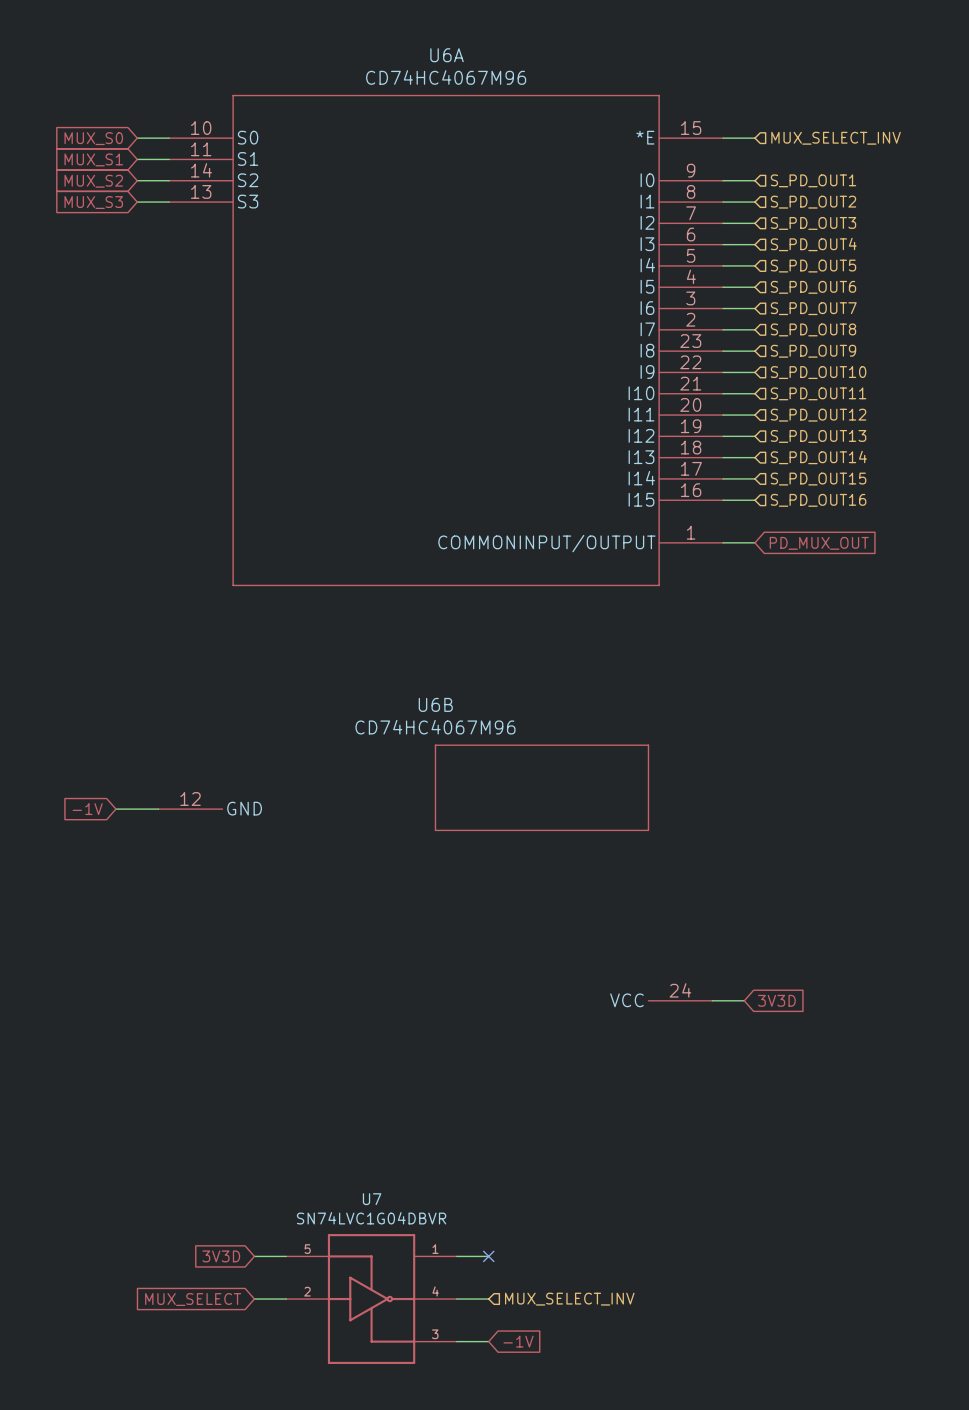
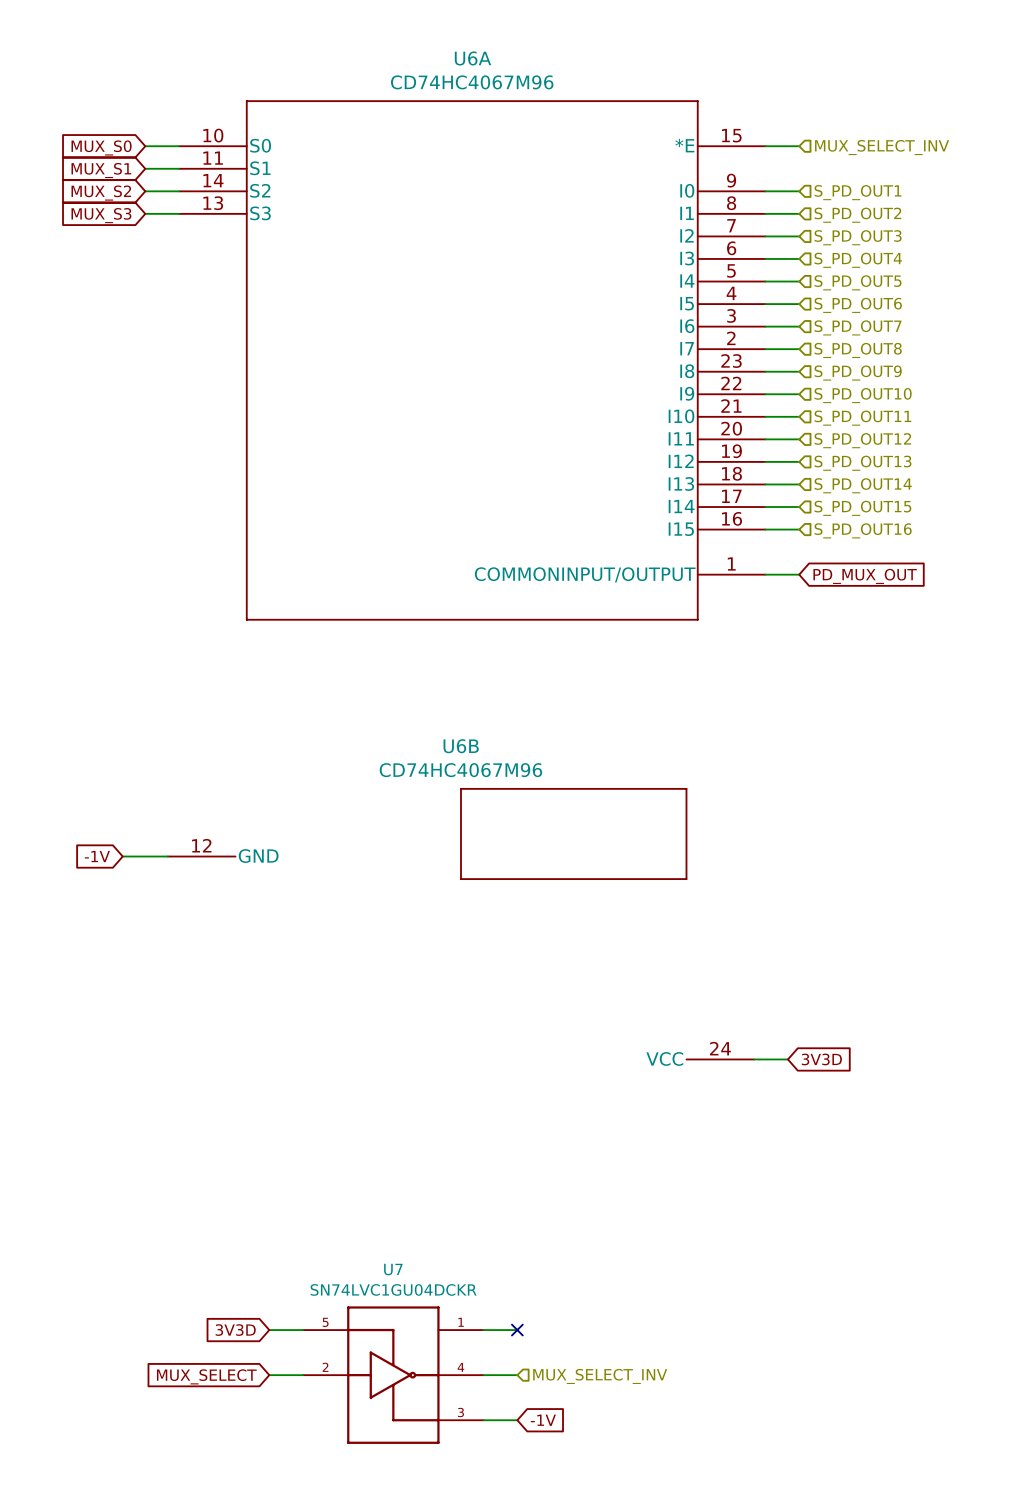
U7 value: SN74LVC1G04DBVR (371, 1218) -> SN74LVC1GU04DCKR (393, 1289)

